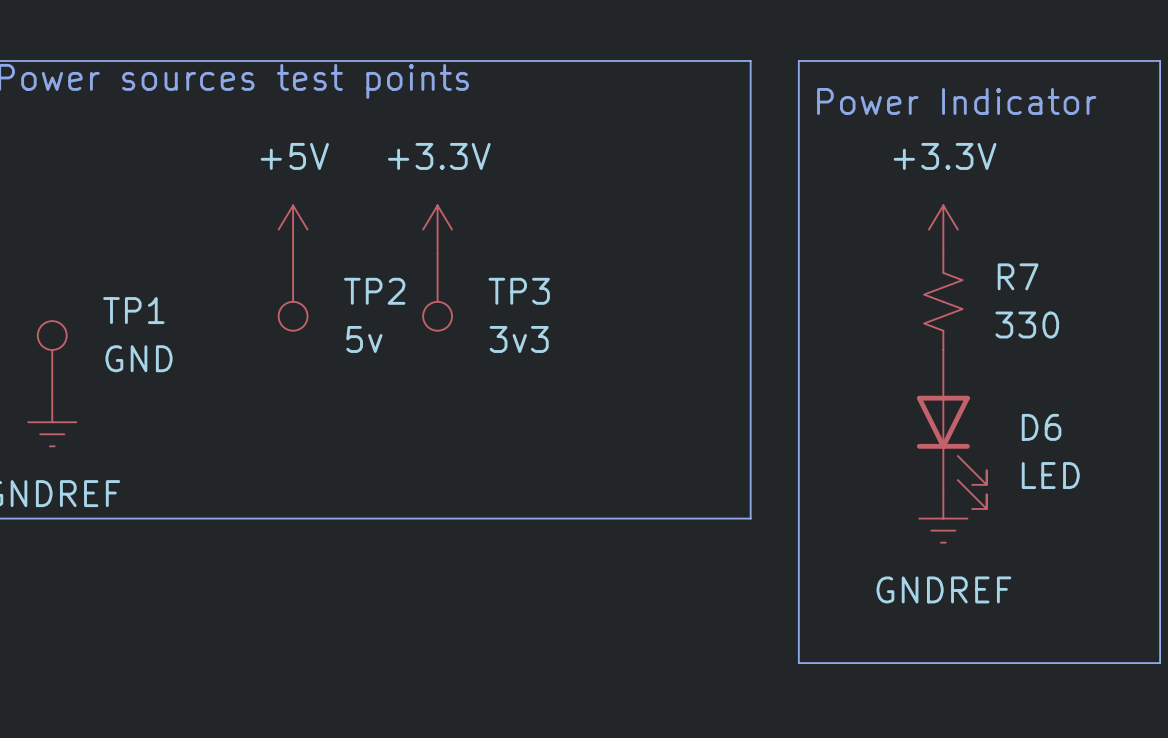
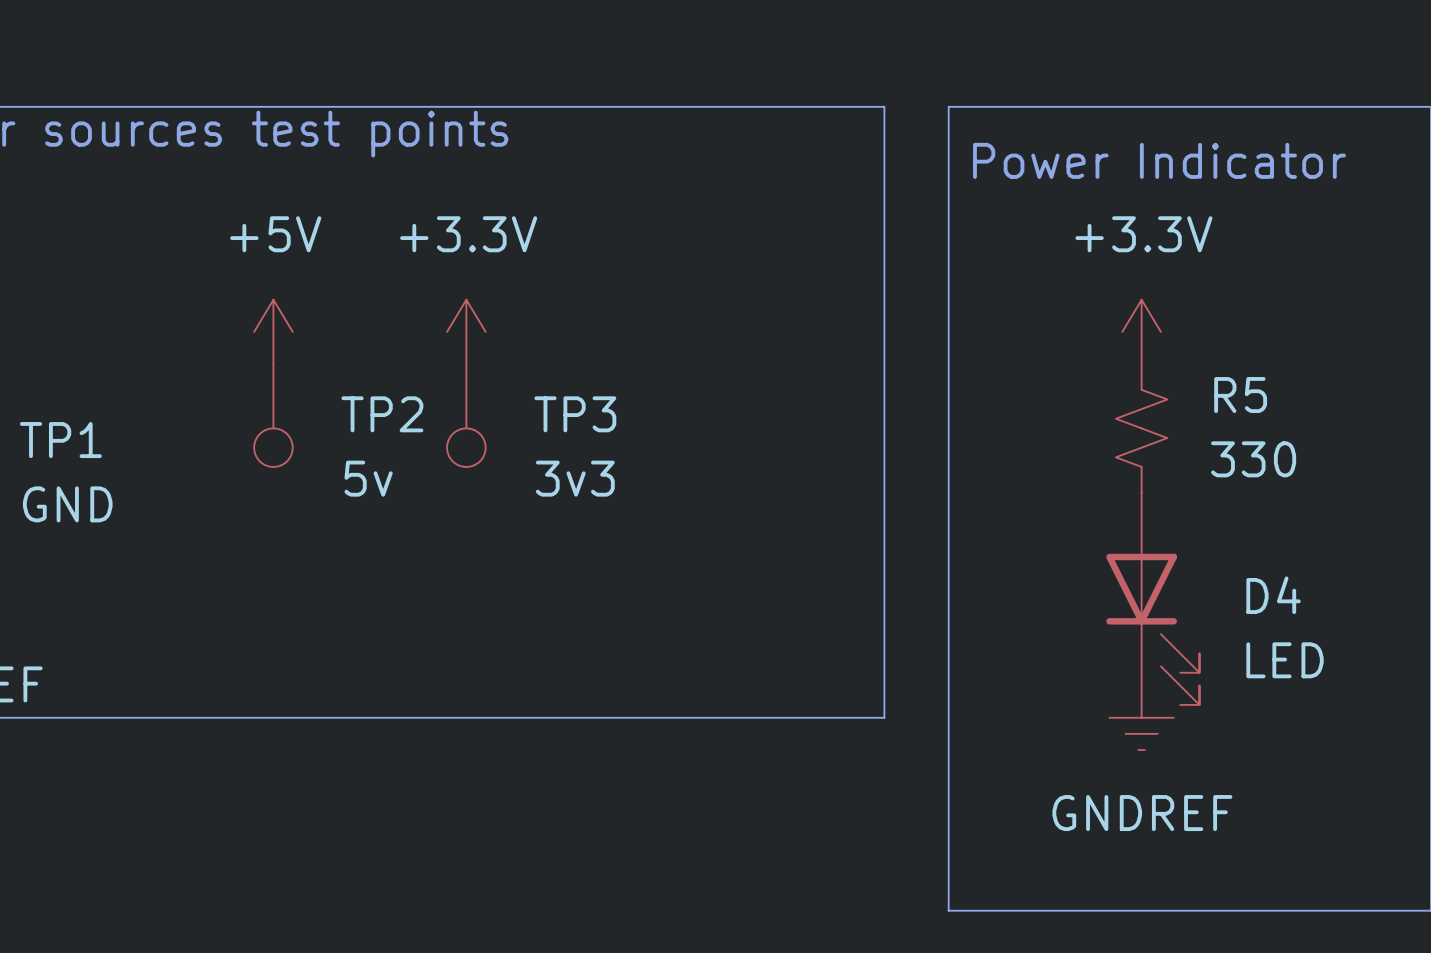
R7 name: R7 (1018, 276) -> R5 (1240, 395)
D6 name: D6 (1041, 427) -> D4 (1273, 595)

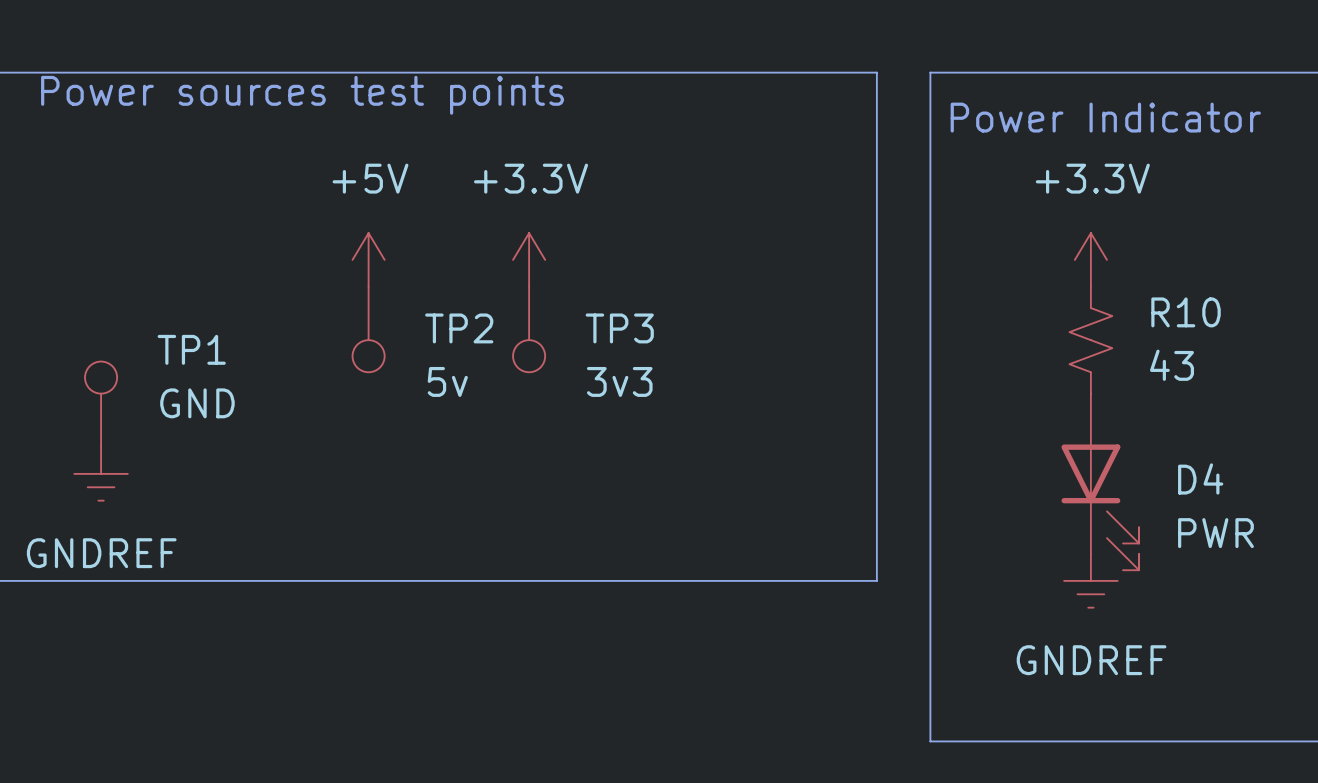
R5 name: R5 (1240, 395) -> R10 (1186, 312)
R5 value: 330 (1253, 459) -> 43 (1172, 365)
D4 value: LED (1285, 660) -> PWR (1215, 533)

